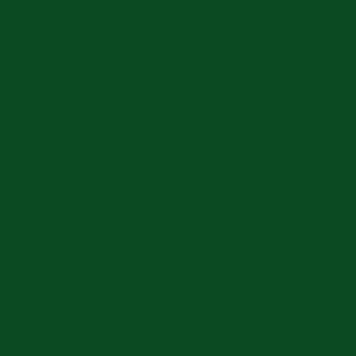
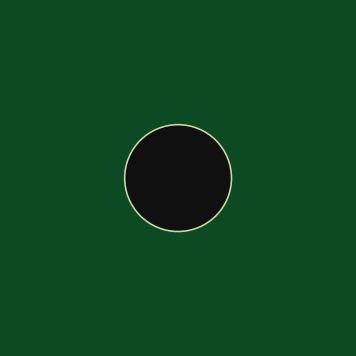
part: none -> (178, 178)

